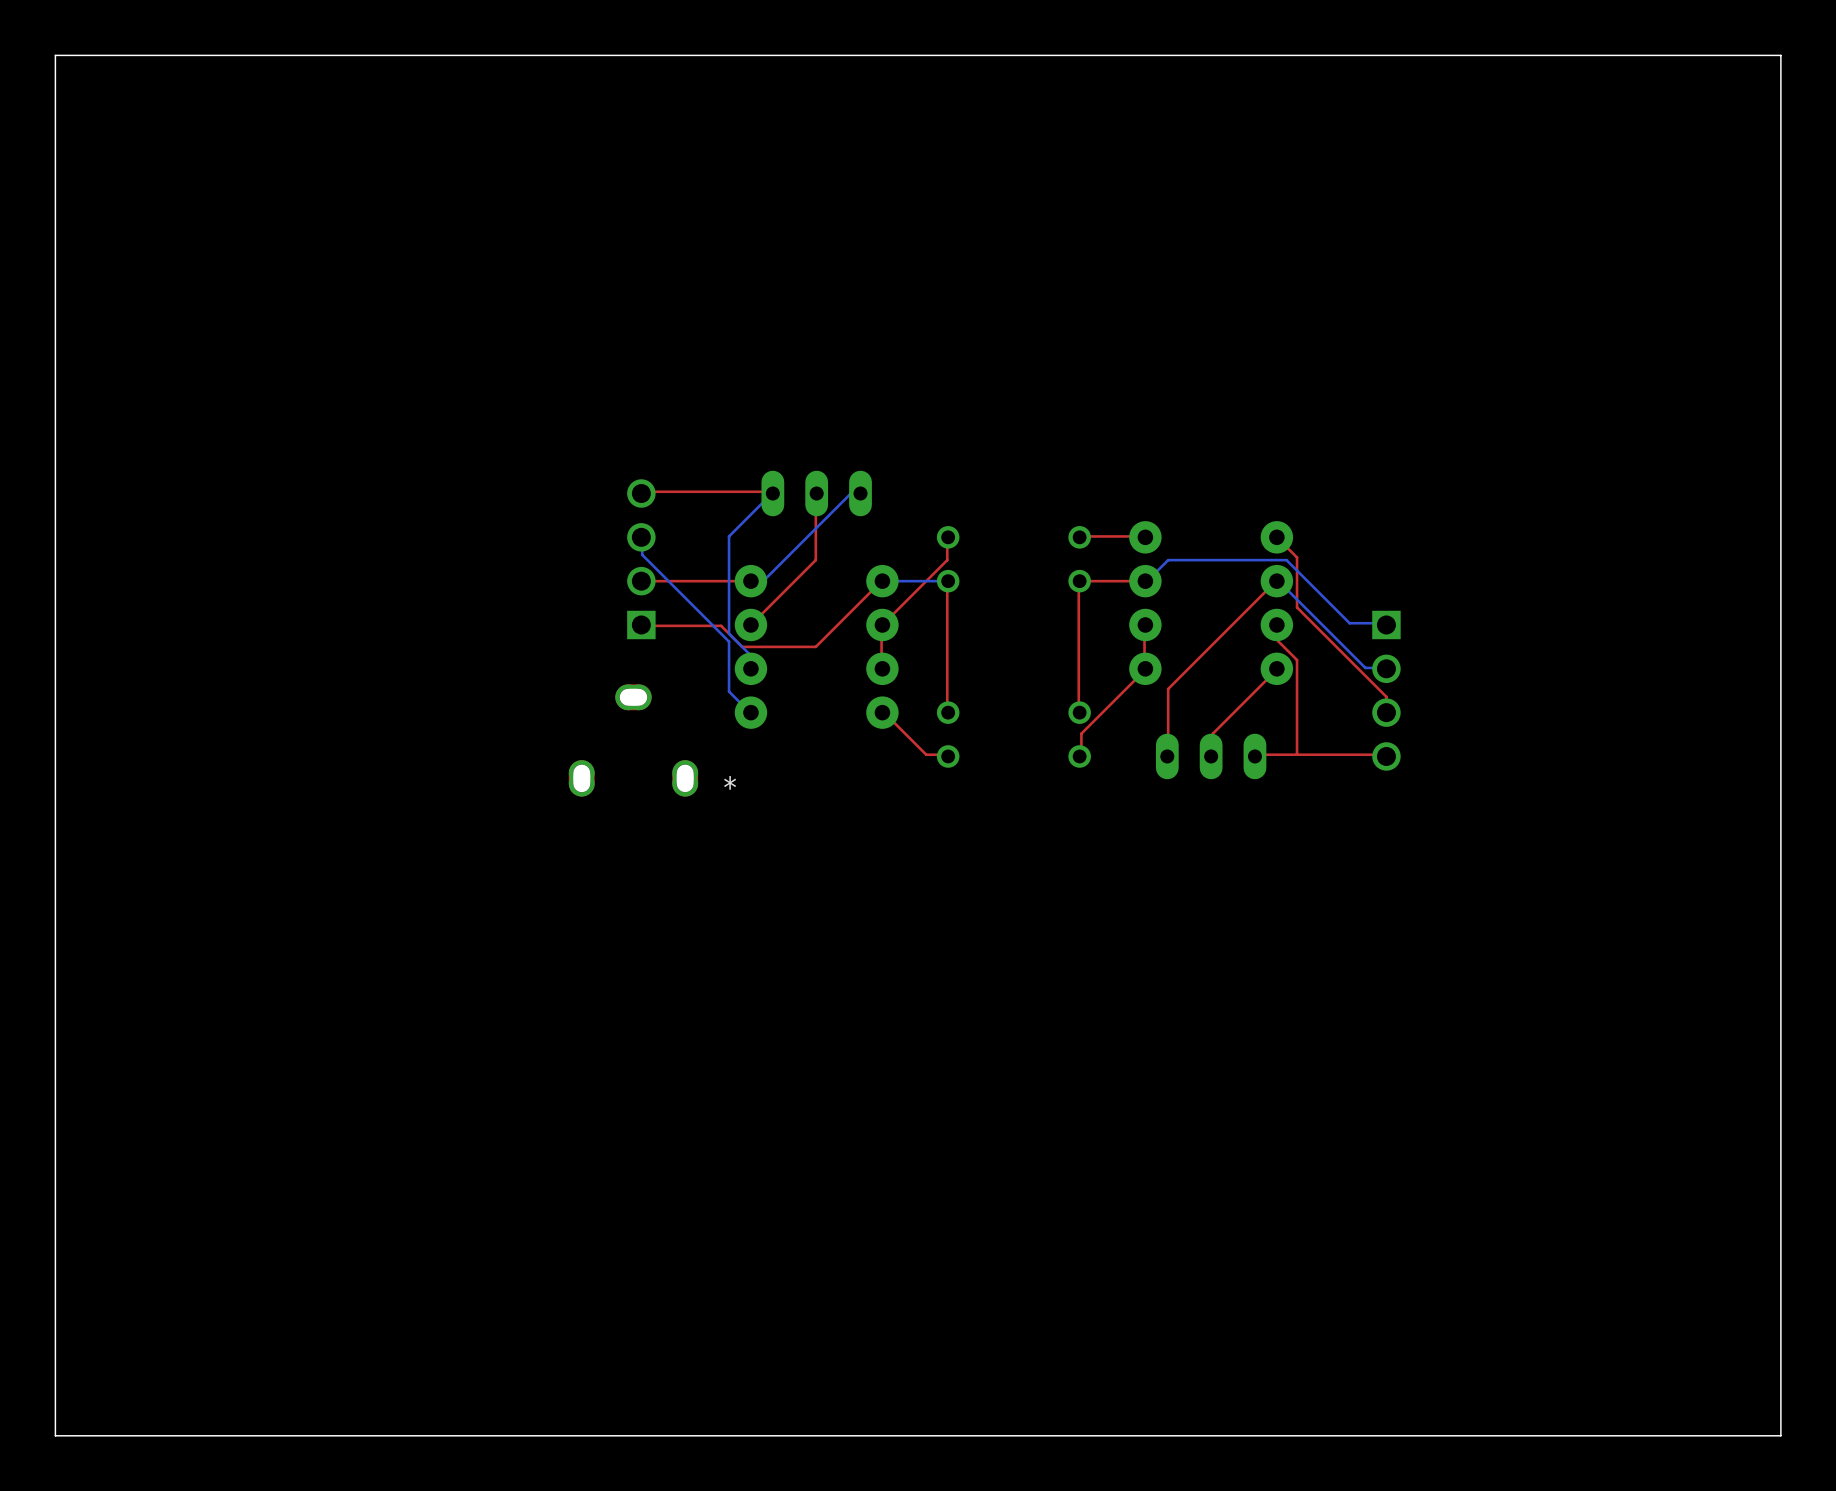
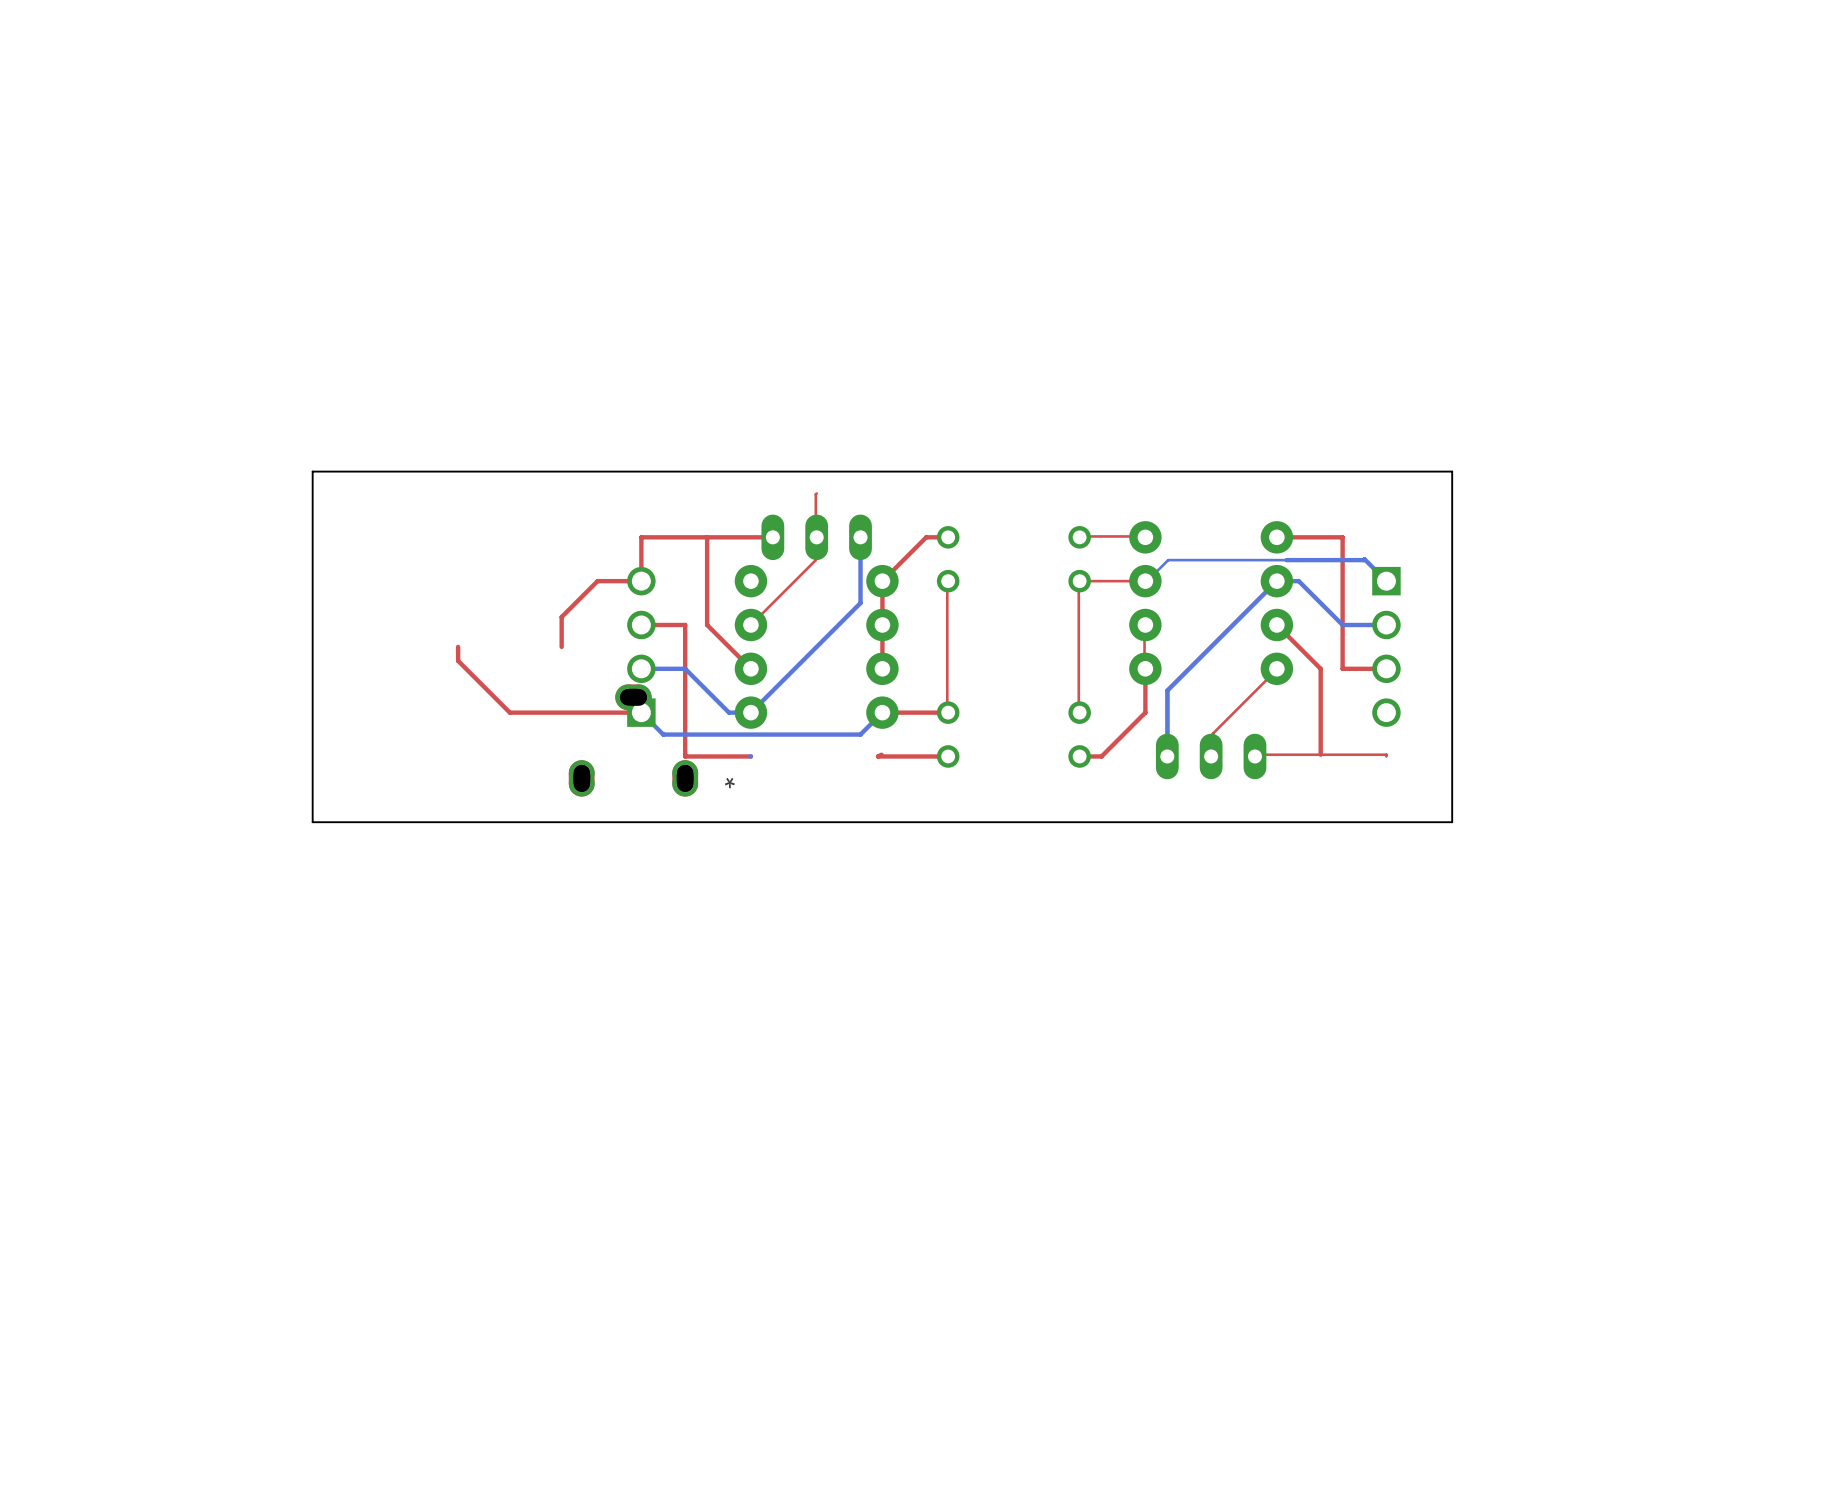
board edge: (1780, 55) (55, 55) (55, 1435) (1780, 1435) (1780, 55) -> none
board edge: none -> (1452, 471) (312, 471) (312, 822) (1452, 822) (1452, 471)
top track: (772, 493) (771, 491) (642, 491) (641, 493) -> none
bottom track: (772, 493) (729, 536) (729, 633) (750, 654) (750, 668) -> none
part position: (816, 493) -> (816, 537)
bottom track: (860, 493) (850, 494) (763, 581) (750, 581) -> none
bottom track: (641, 537) (642, 554) (729, 641) (729, 691) (750, 712) -> none
top track: none -> (707, 537) (707, 624) (750, 668)
top track: none -> (772, 537) (641, 537) (641, 581) (597, 581) (561, 617) (561, 646)
bottom track: none -> (860, 537) (860, 603) (750, 712) (729, 712) (685, 668) (641, 668)
top track: (1276, 537) (1297, 557) (1297, 607) (1386, 696) (1386, 712) -> (1276, 537) (1342, 537) (1342, 668) (1386, 668)
top track: (947, 539) (947, 560) (881, 625) (882, 668) -> (948, 537) (926, 537) (882, 581) (882, 668)
part position: (641, 559) -> (641, 646)
bottom track: (1286, 560) (1349, 623) (1386, 623) (1386, 624) -> (1278, 581) (1298, 581) (1342, 624) (1386, 624)
bottom track: none -> (1286, 560) (1364, 559) (1386, 581)
top track: (750, 581) (641, 581) -> none
top track: (882, 581) (815, 646) (742, 646) (721, 625) (641, 624) -> (750, 756) (685, 756) (685, 624) (641, 624)
bottom track: (948, 581) (882, 581) -> none
bottom track: none -> (1276, 581) (1167, 690) (1167, 756)
bottom track: (1278, 581) (1365, 667) (1386, 668) -> none
top track: none -> (1276, 624) (1320, 668) (1320, 754)
top track: (1278, 625) (1278, 641) (1297, 660) (1297, 754) -> none
top track: none -> (458, 646) (458, 660) (509, 712) (641, 712)
top track: none -> (1145, 668) (1145, 712) (1101, 756) (1079, 756)
top track: (1144, 670) (1081, 733) (1081, 754) -> none
part position: (1386, 690) -> (1386, 646)
bottom track: none -> (882, 712) (860, 734) (663, 734) (641, 712)
top track: (884, 712) (926, 754) (947, 754) (948, 756) -> (881, 754) (878, 756) (948, 756)
top track: none -> (948, 712) (884, 712)
bottom track: none -> (750, 756) (750, 756)

